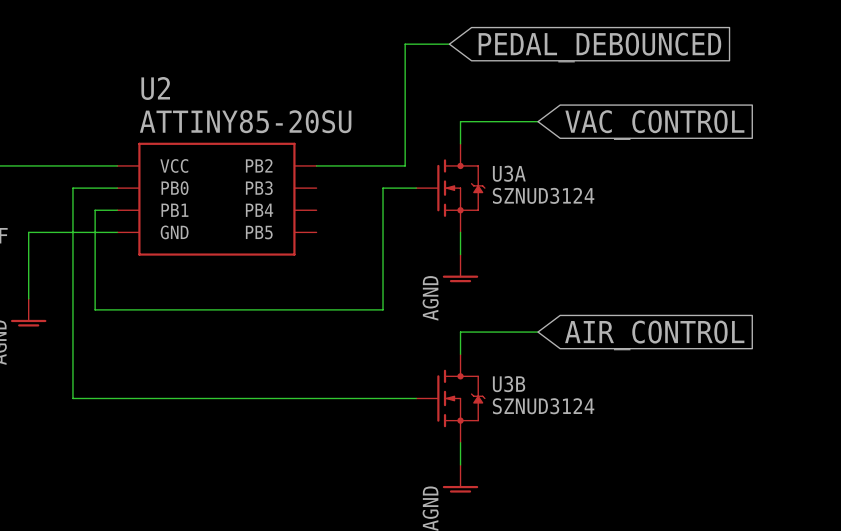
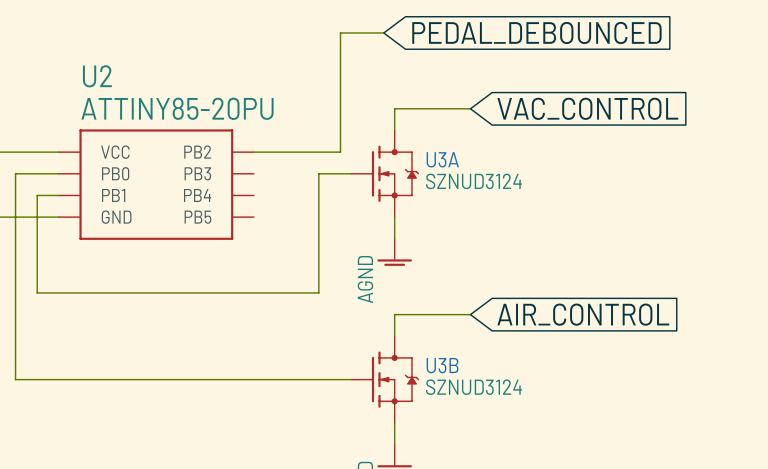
U2 value: ATTINY85-20SU (245, 121) -> ATTINY85-20PU (177, 108)

